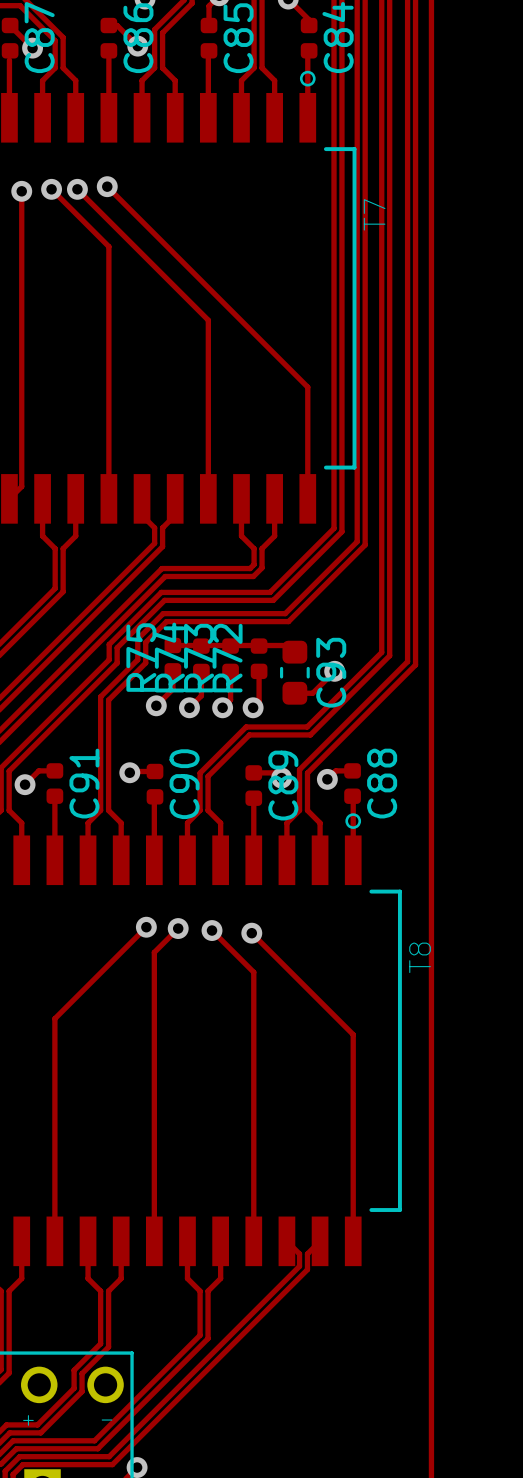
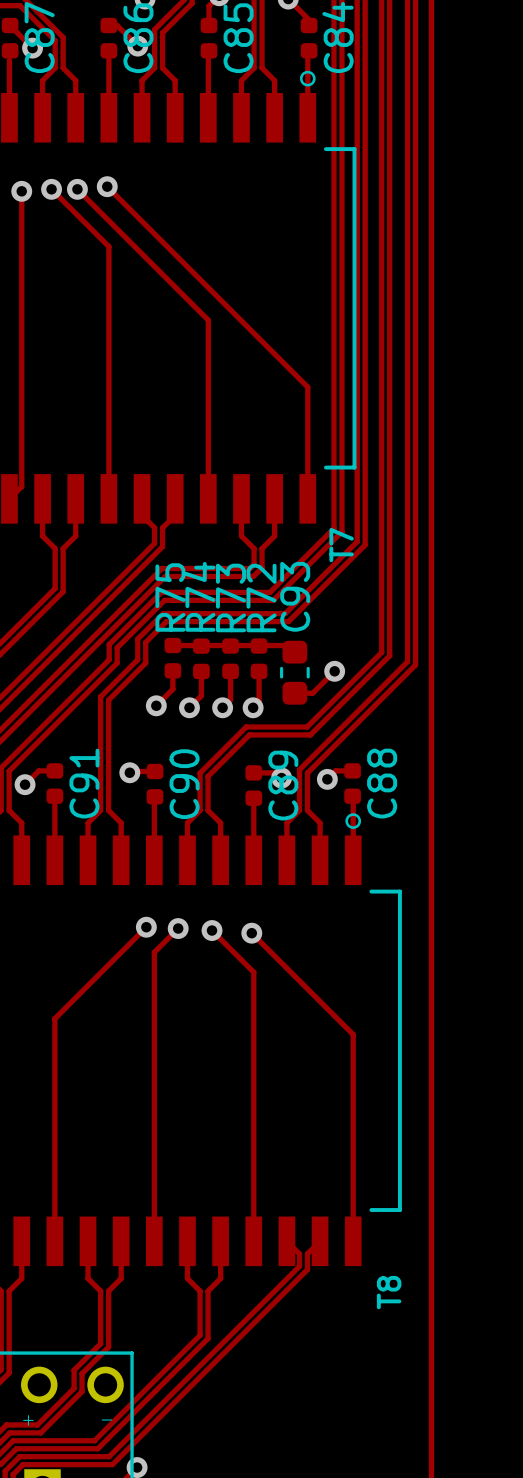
T7 name position: T7 (374, 214) -> T7 (341, 545)
R75 name position: R75 (141, 657) -> R75 (170, 597)
R74 name position: R74 (169, 657) -> R74 (199, 596)
R73 name position: R73 (199, 658) -> R73 (230, 597)
R72 name position: R72 (227, 658) -> R72 (261, 597)
C93 name position: C93 (331, 672) -> C93 (295, 596)
T8 name position: T8 (420, 957) -> T8 (389, 1292)

